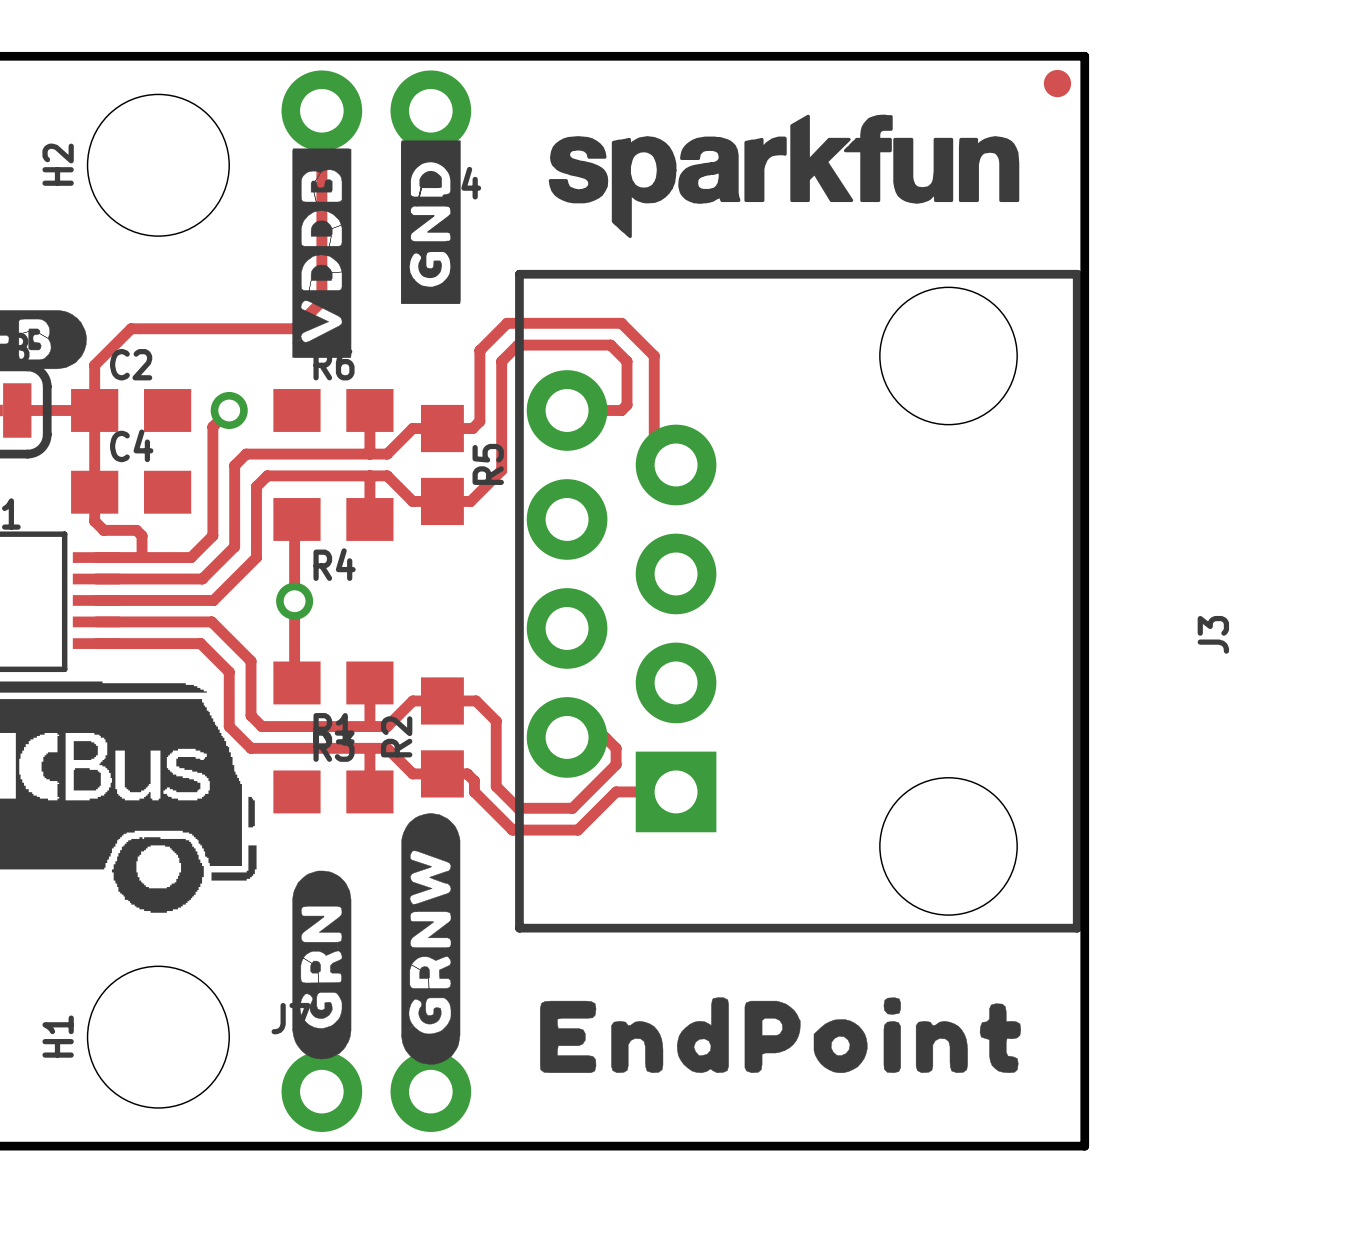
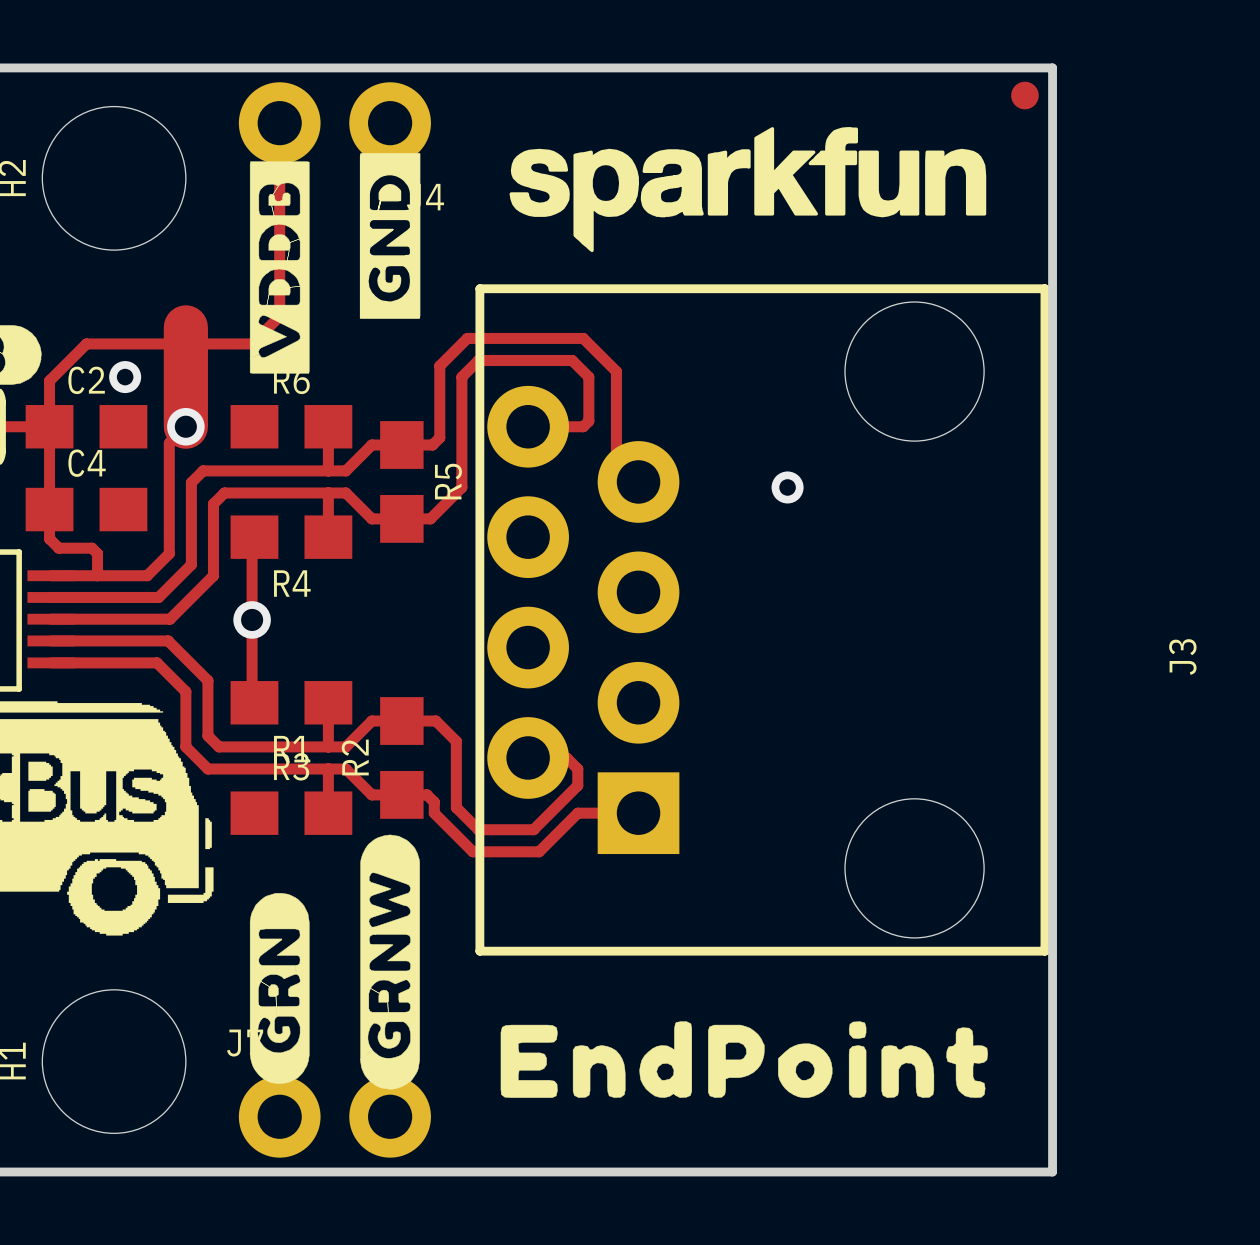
track: none -> (185, 327) (185, 426)
via: none -> (125, 377)
via: none -> (787, 487)

